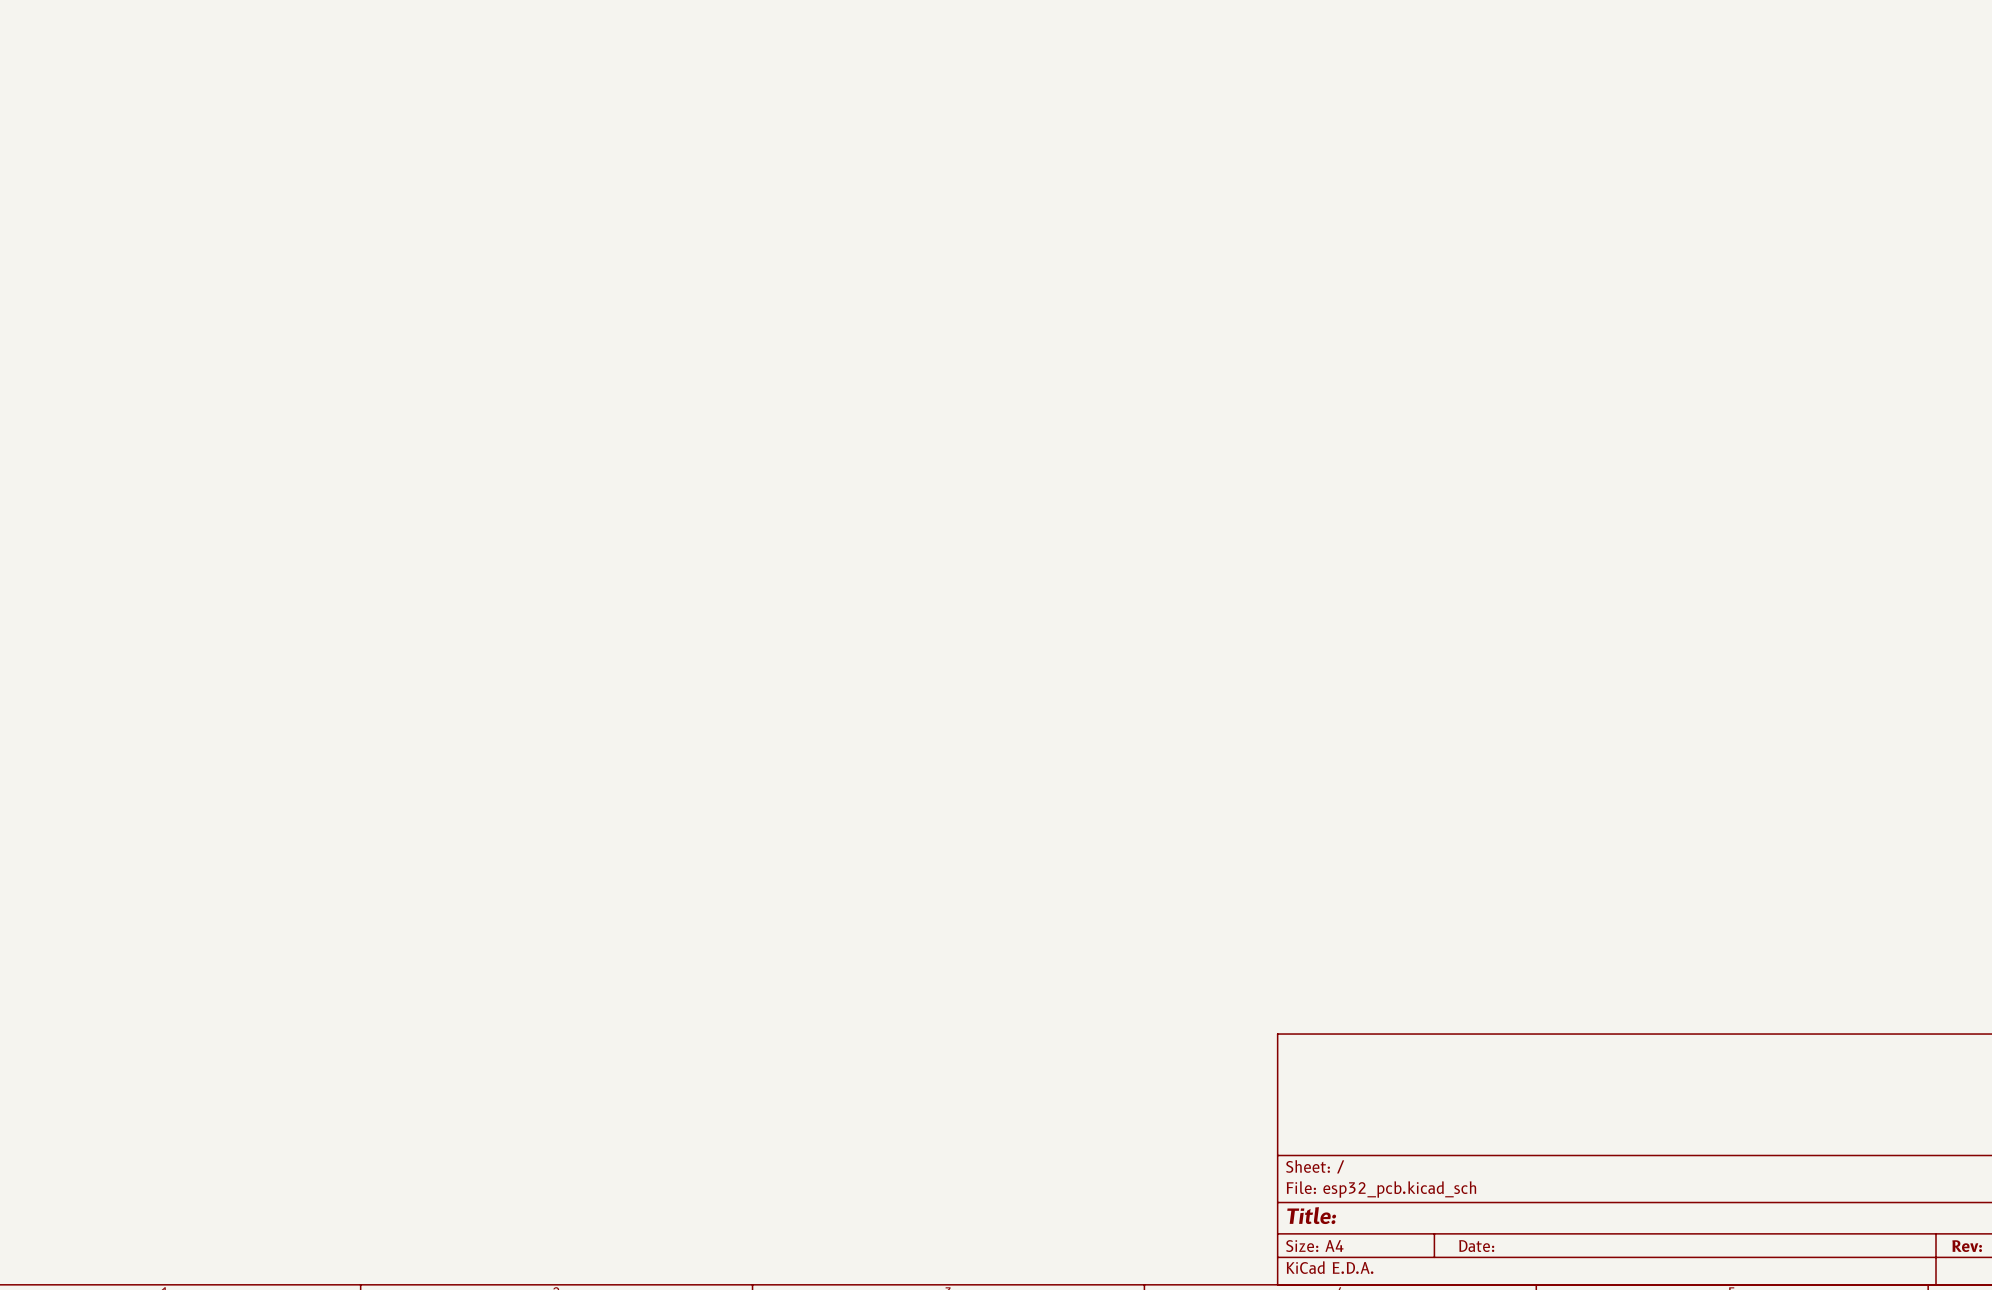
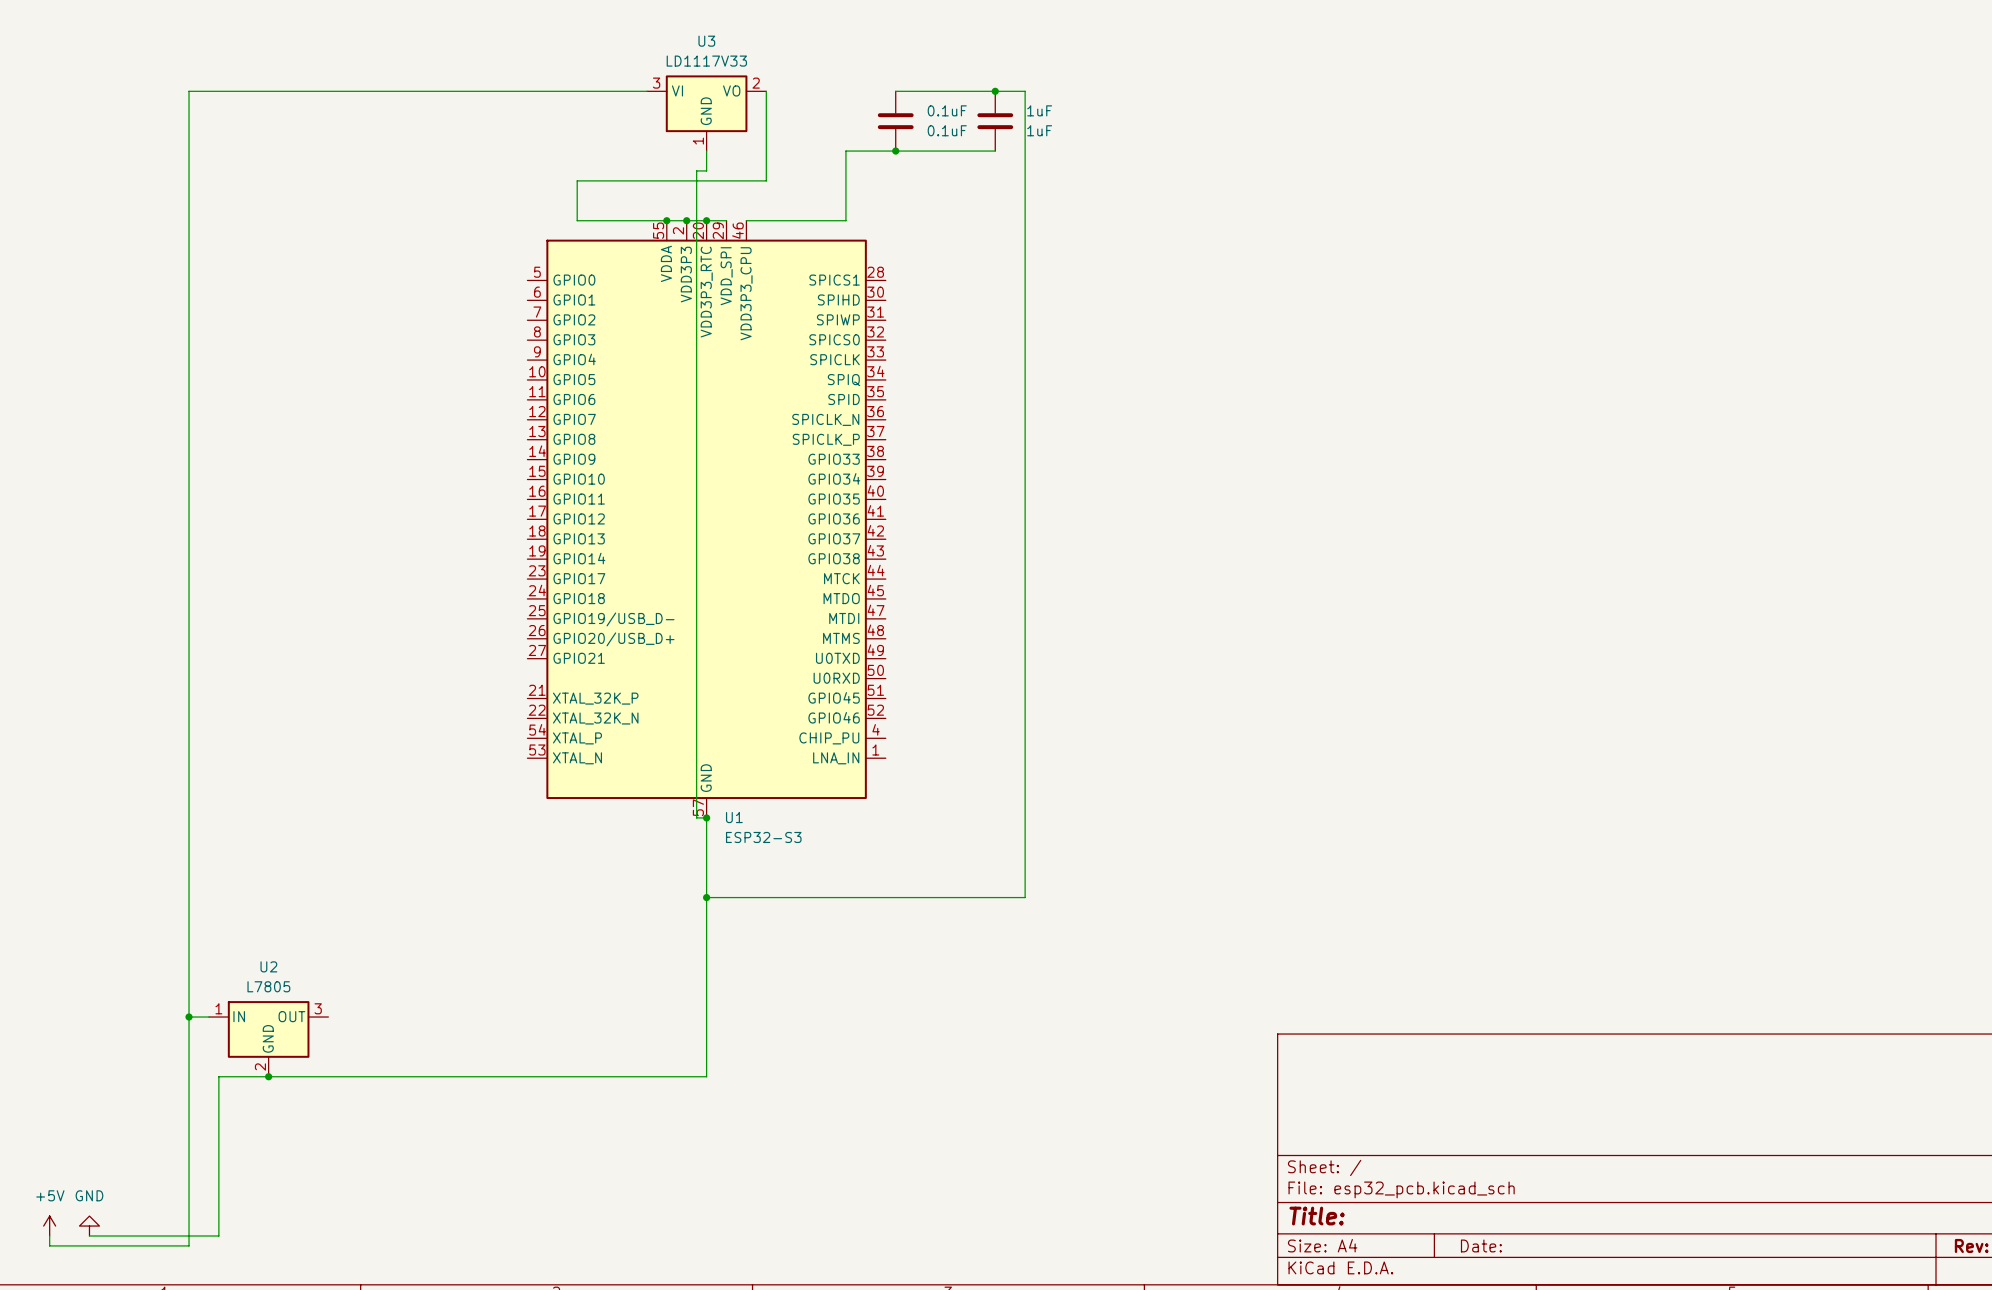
wire: none -> (646, 91) (189, 91) (189, 1245) (49, 1245) (49, 1235)
wire: none -> (766, 91) (766, 180) (577, 180) (577, 220) (726, 220)
wire: none -> (895, 91) (1025, 91) (1025, 897) (706, 897)
junction: none -> (995, 91)
U3: none -> LD1117V33 (706, 113)
0.1uF: none -> 0.1uF (895, 121)
1uF: none -> 1uF (995, 121)
wire: none -> (706, 151) (706, 170) (696, 170) (696, 817) (706, 817) (706, 1076) (218, 1076) (218, 1235) (89, 1235)
junction: none -> (895, 151)
wire: none -> (995, 151) (845, 151) (845, 220) (746, 220)
junction: none -> (666, 220)
junction: none -> (686, 220)
junction: none -> (706, 220)
U1: none -> ESP32-S3 (706, 519)
junction: none -> (706, 817)
junction: none -> (706, 897)
wire: none -> (189, 1017) (208, 1017)
junction: none -> (189, 1017)
U2: none -> L7805 (268, 1038)
junction: none -> (268, 1076)
power symbol: none -> +5V (49, 1226)
power symbol: none -> GND (89, 1226)

